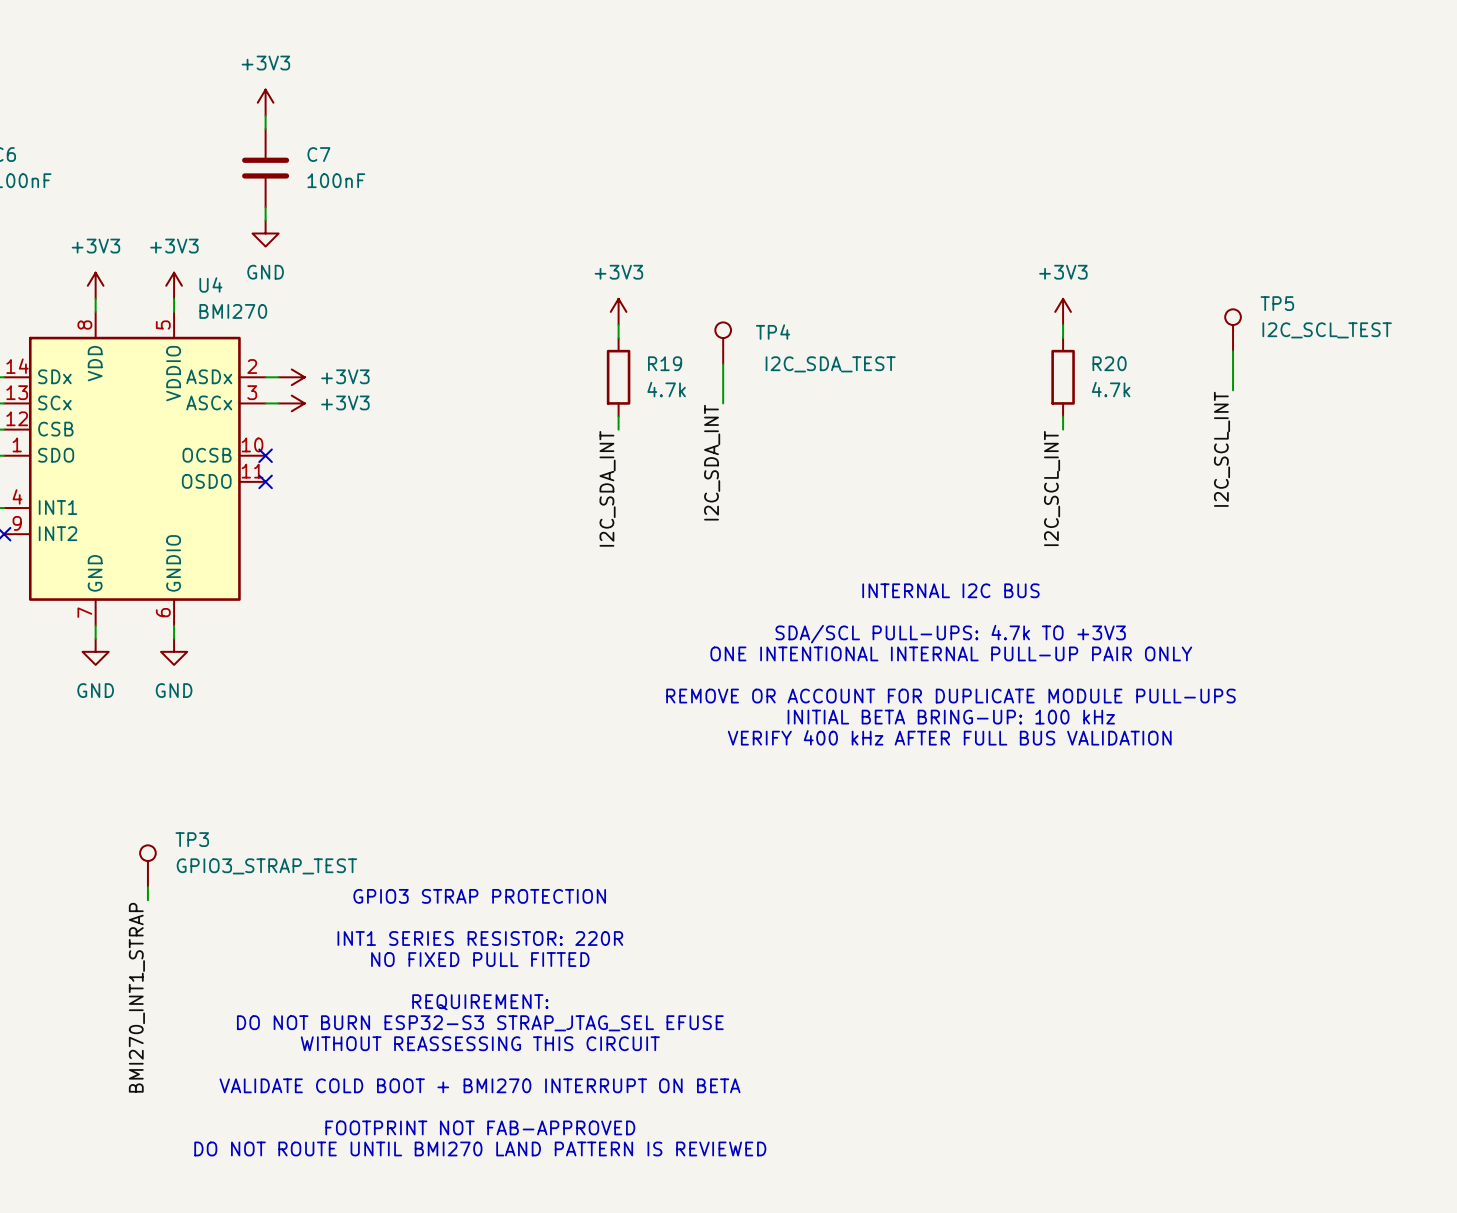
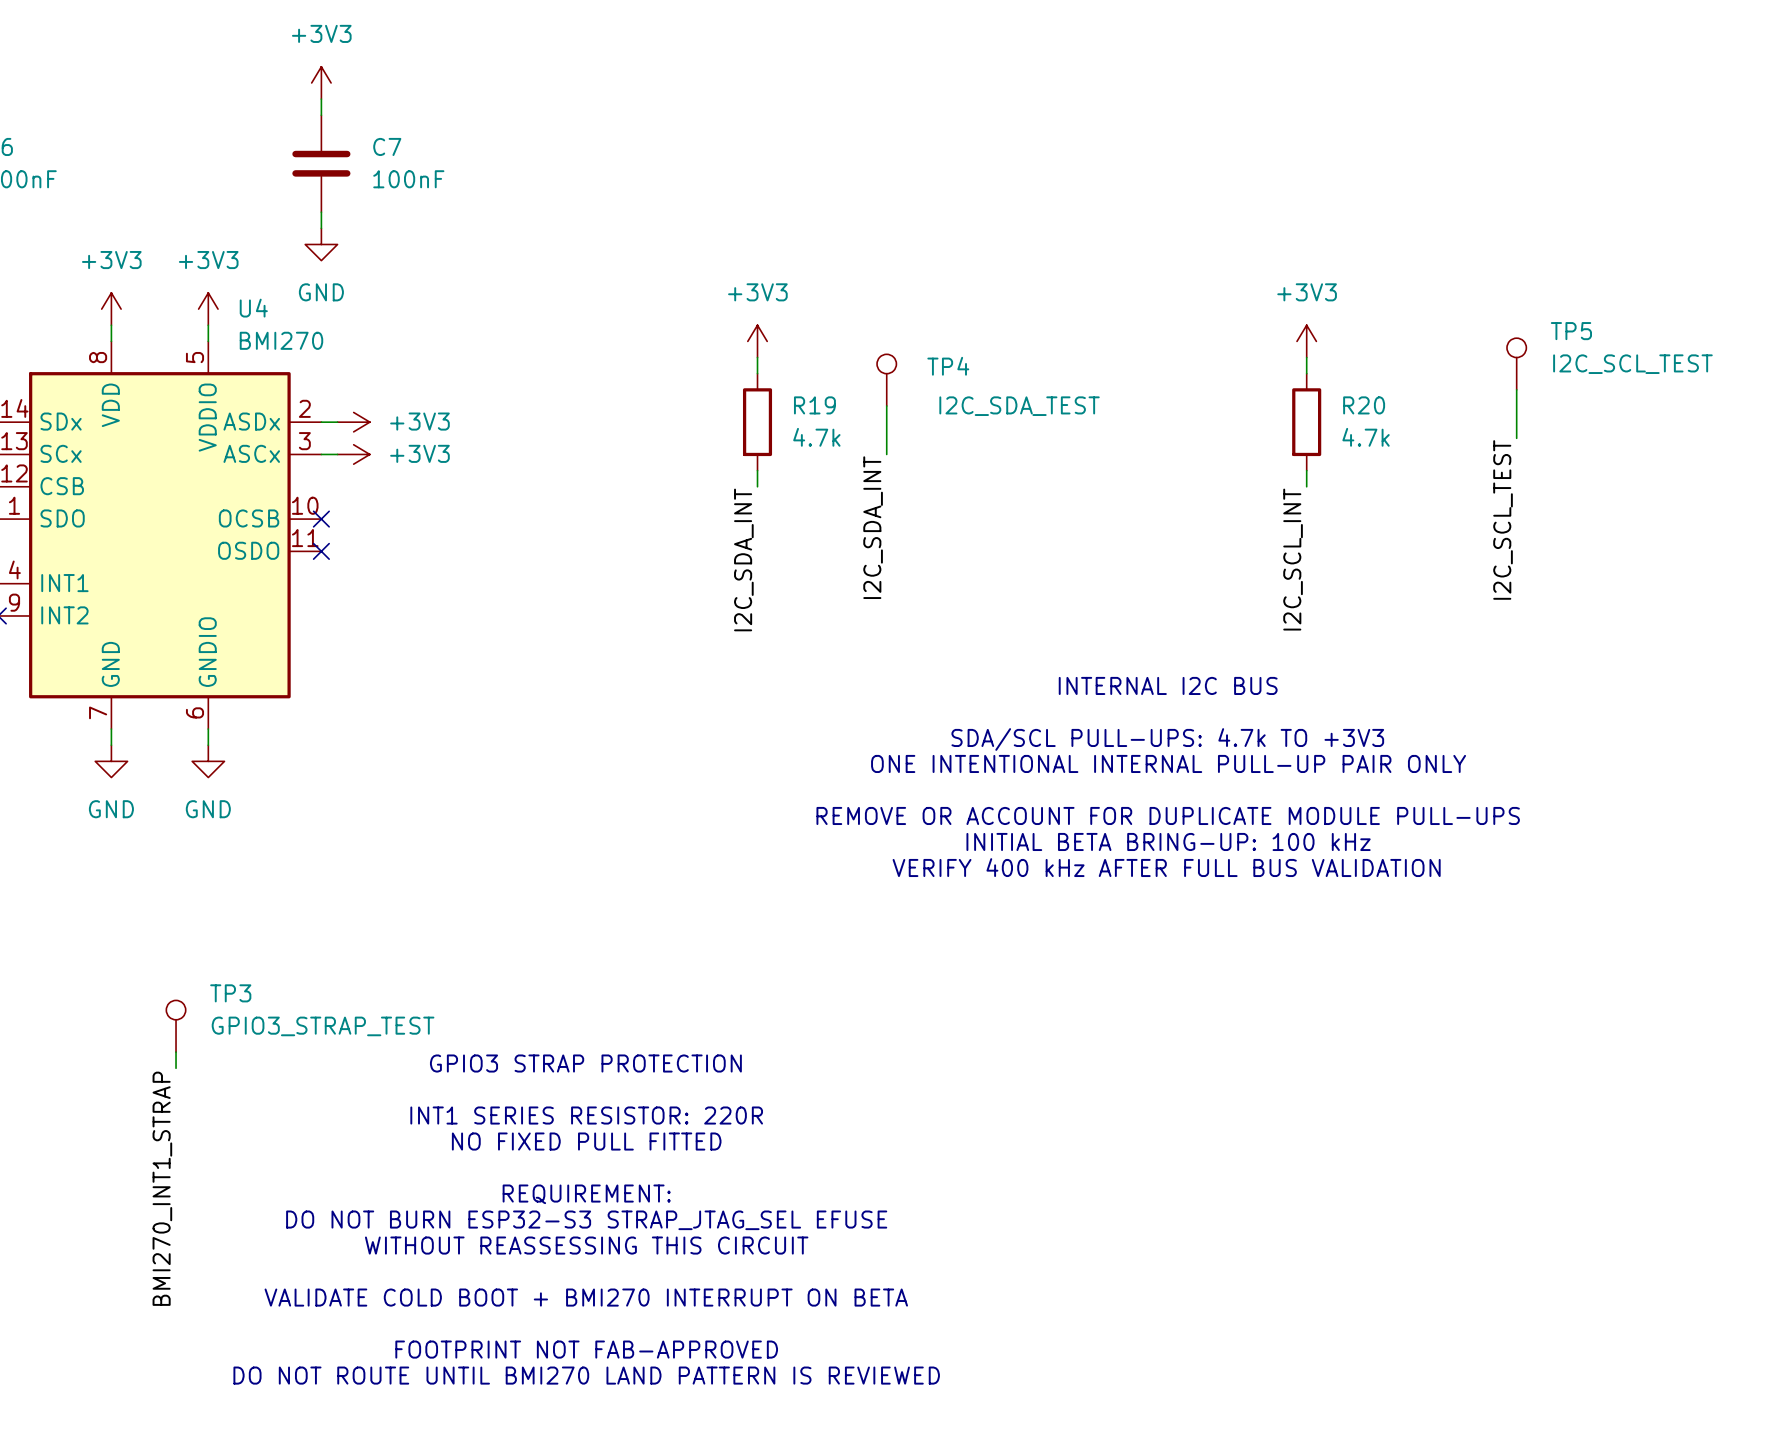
label: I2C_SCL_INT (1222, 449) -> I2C_SCL_TEST (1503, 519)

